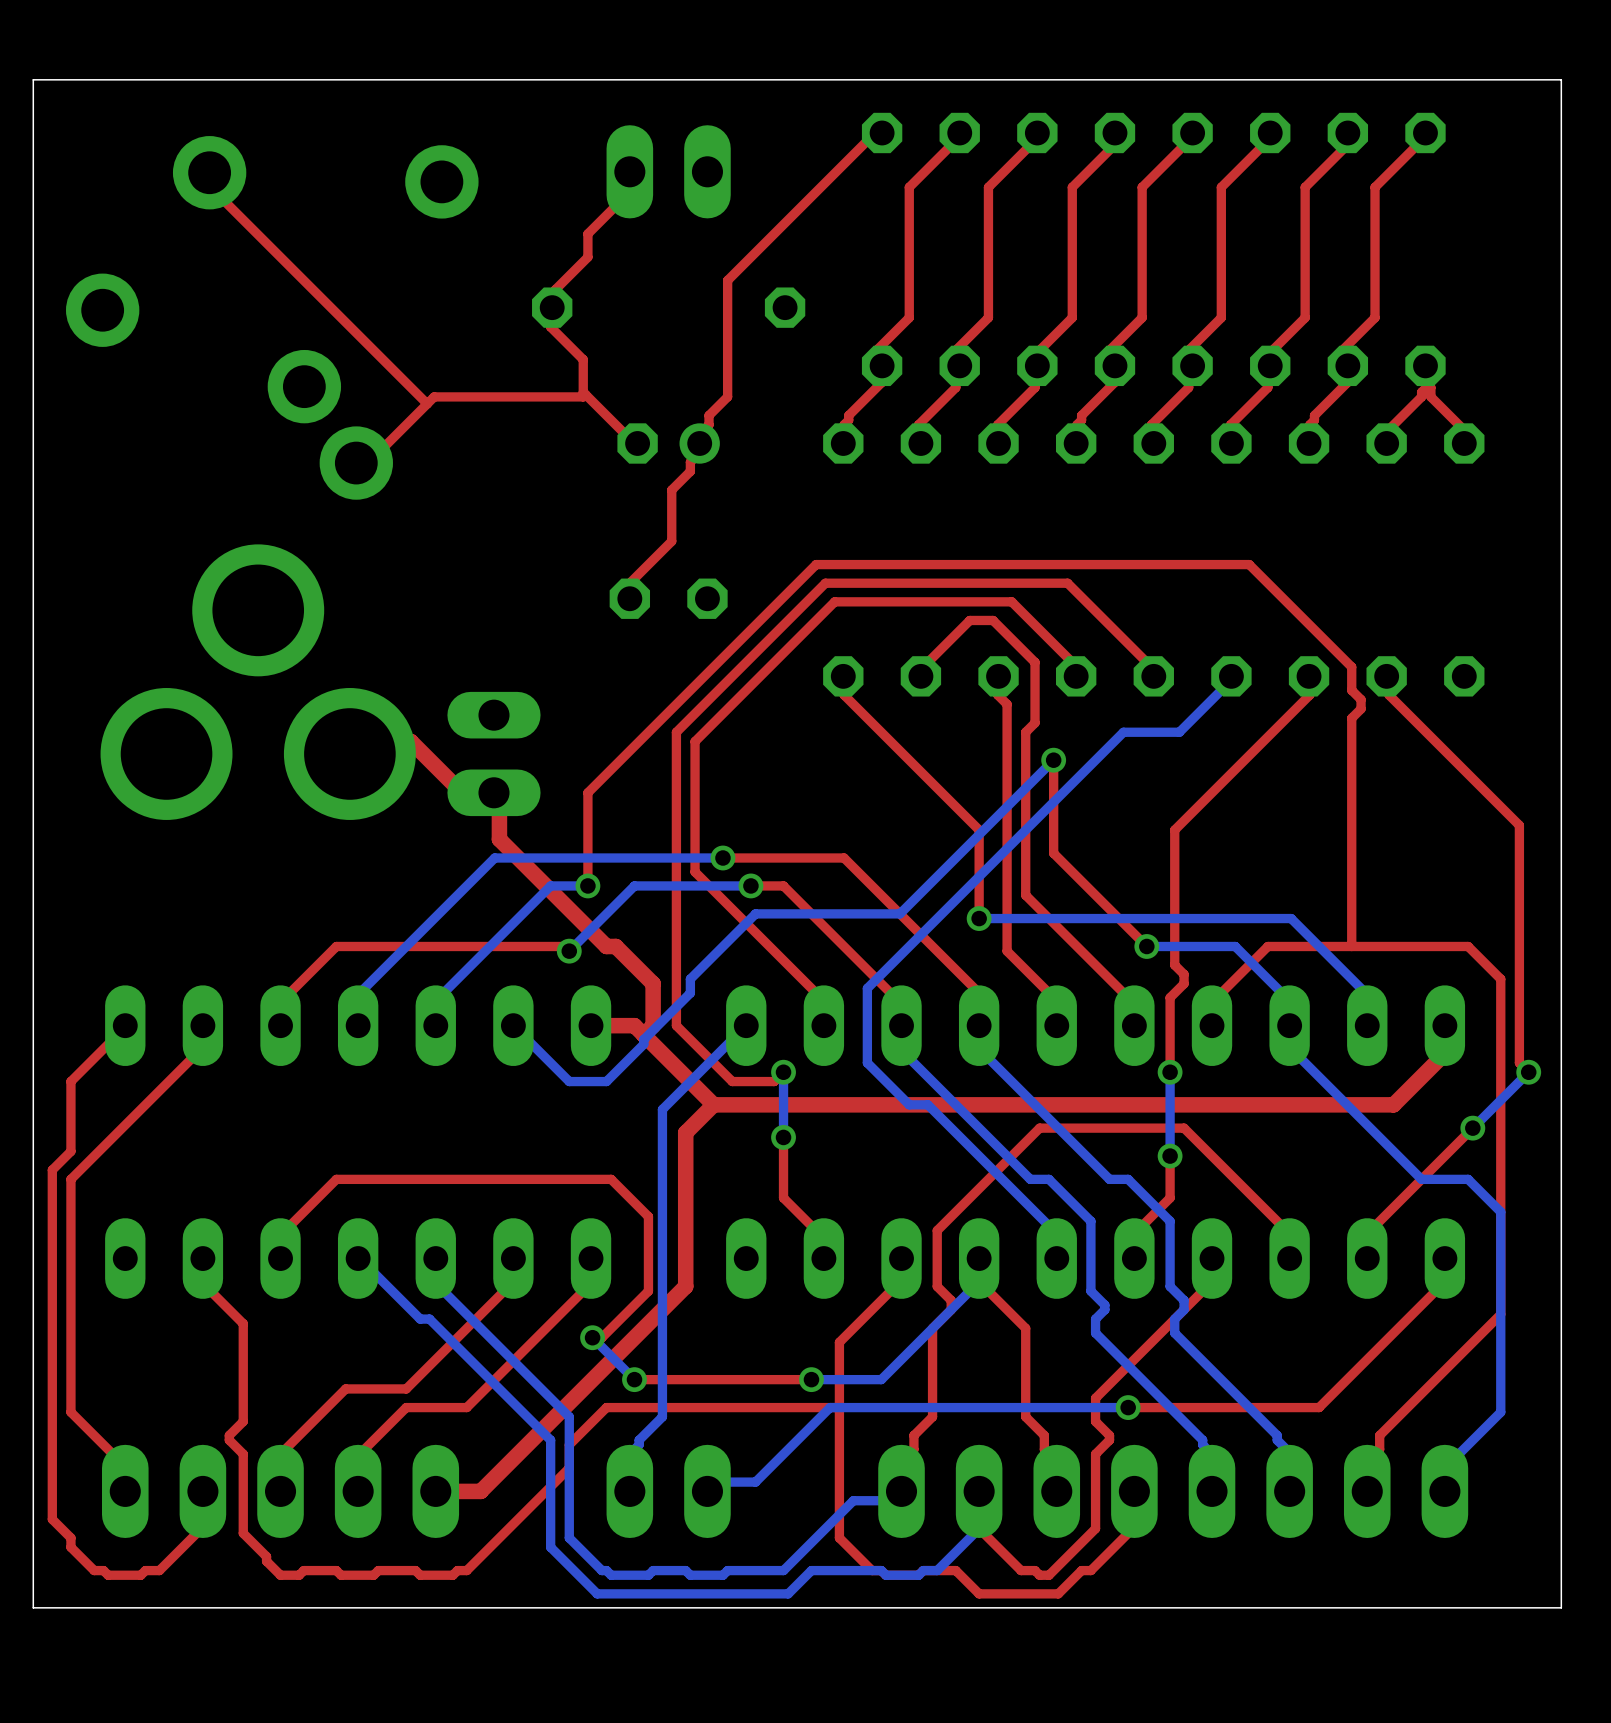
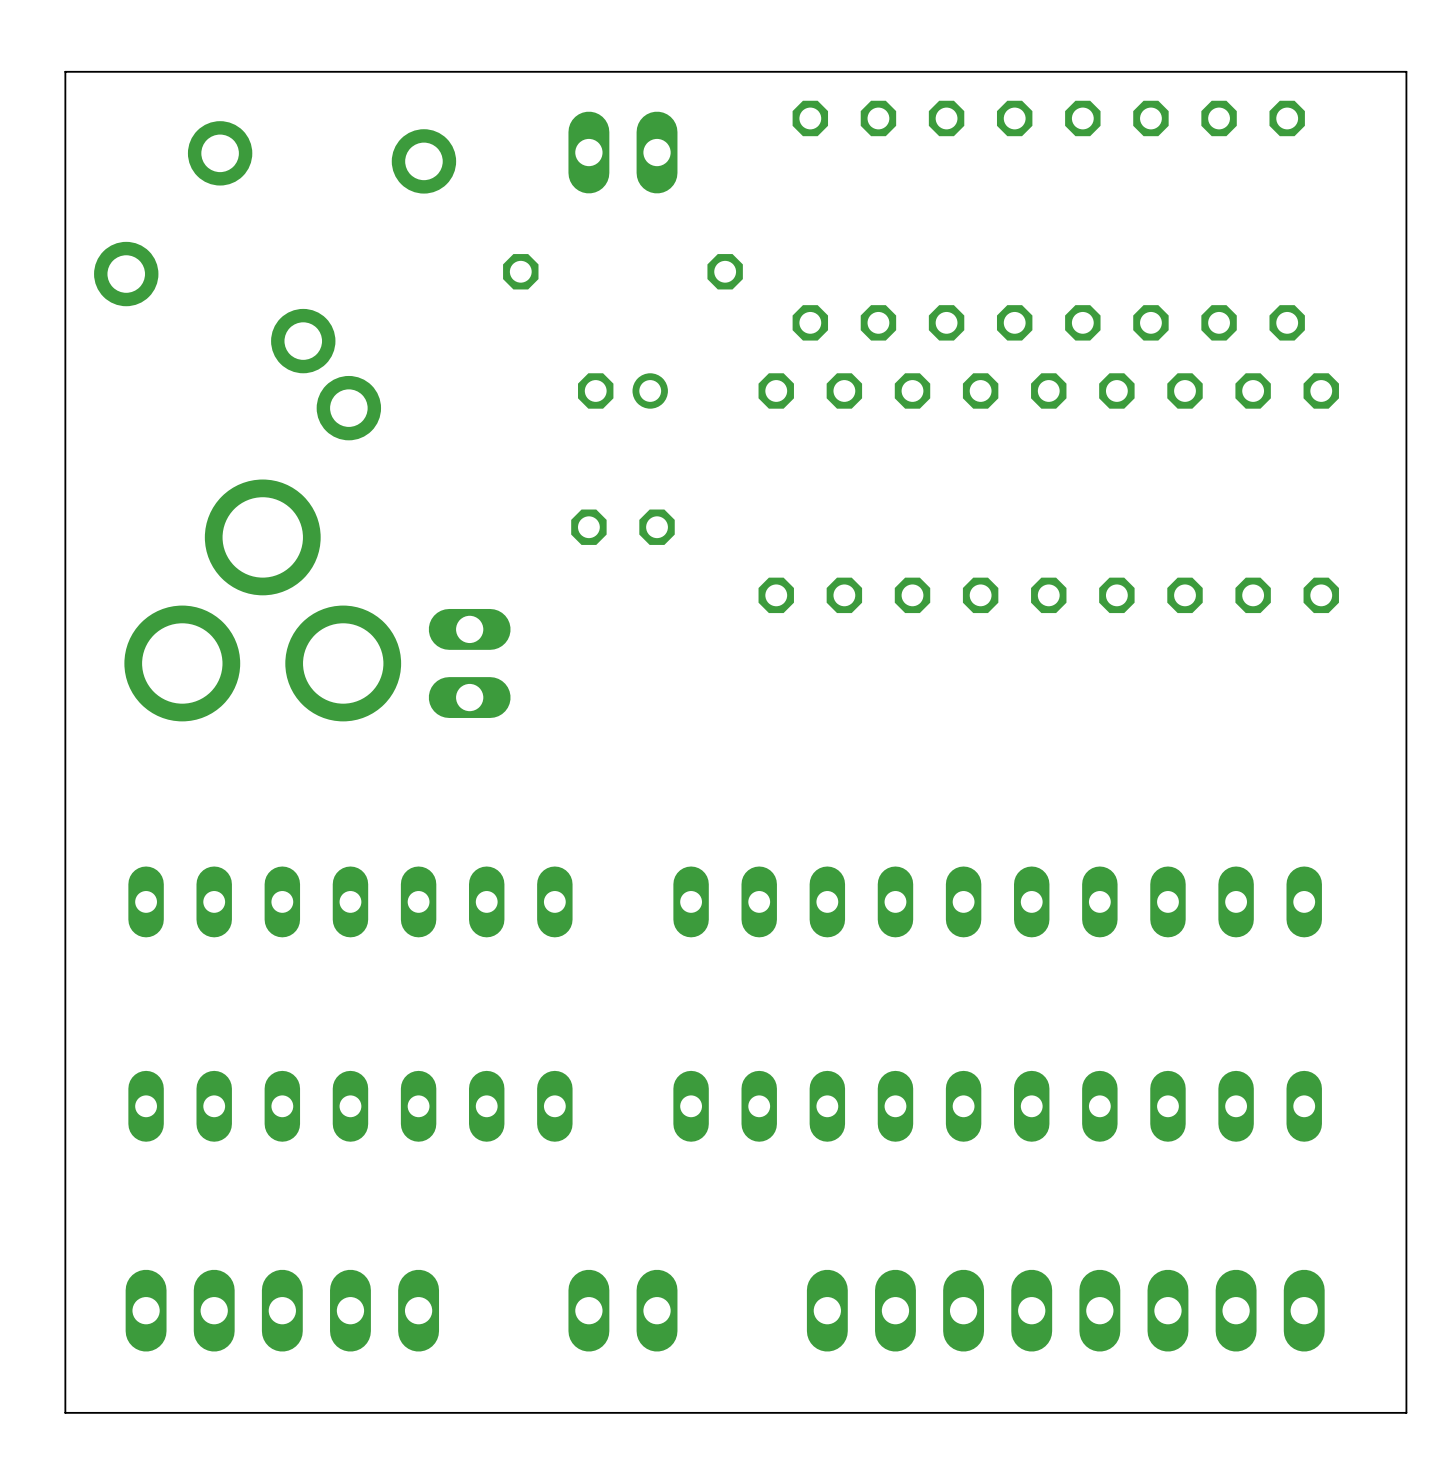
top track: (882, 132) (881, 136) (872, 136) (727, 280) (727, 396) (709, 415) (709, 424) (699, 434) (699, 452) (690, 462) (690, 471) (671, 490) (671, 541) (629, 583) (629, 598) -> none
top track: (959, 132) (955, 136) (955, 140) (909, 187) (909, 317) (876, 350) (876, 368) (882, 365) (881, 382) (848, 415) (848, 420) (844, 424) (843, 443) -> none
top track: (1037, 132) (1035, 140) (988, 187) (988, 317) (955, 350) (955, 364) (959, 365) (955, 368) (955, 387) (918, 424) (918, 443) (920, 443) -> none
top track: (1114, 132) (1114, 145) (1072, 187) (1072, 317) (1039, 350) (1039, 364) (1035, 368) (1035, 387) (997, 424) (998, 443) -> none
top track: (1192, 132) (1188, 136) (1188, 140) (1142, 187) (1142, 317) (1109, 350) (1109, 368) (1114, 365) (1114, 382) (1081, 415) (1081, 420) (1076, 424) (1076, 443) -> none
top track: (1270, 132) (1267, 140) (1221, 187) (1221, 317) (1188, 350) (1188, 364) (1192, 365) (1188, 368) (1188, 387) (1151, 424) (1151, 443) (1153, 443) -> none
top track: (1347, 132) (1347, 145) (1305, 187) (1305, 317) (1272, 350) (1272, 364) (1267, 368) (1267, 387) (1230, 424) (1231, 443) -> none
top track: (1425, 132) (1421, 136) (1421, 140) (1375, 187) (1375, 317) (1342, 350) (1342, 368) (1347, 365) (1347, 382) (1314, 415) (1314, 420) (1309, 424) (1309, 443) -> none
top track: (629, 171) (629, 191) (587, 233) (587, 257) (555, 289) (555, 303) (550, 308) (550, 327) (583, 359) (583, 392) (634, 443) (637, 443) -> none
top track: (209, 172) (210, 187) (427, 403) -> none
top track: (1425, 365) (1426, 382) (1430, 387) (1430, 396) (1463, 429) (1464, 443) -> none
top track: (1428, 385) (1421, 392) (1421, 396) (1388, 429) (1388, 443) (1386, 443) -> none
top track: (585, 394) (583, 396) (434, 396) (369, 462) (356, 463) -> none
top track: (843, 676) (844, 694) (979, 830) (979, 918) -> none
top track: (920, 676) (923, 676) (923, 667) (969, 620) (993, 620) (1035, 662) (1035, 722) (1025, 732) (1025, 895) (1132, 1002) (1132, 1025) (1134, 1025) -> none
top track: (998, 676) (997, 694) (1007, 704) (1007, 951) (1053, 997) (1053, 1025) (1056, 1025) -> none
top track: (1076, 676) (1072, 676) (1072, 662) (1011, 601) (834, 601) (695, 741) (695, 871) (820, 997) (820, 1025) (823, 1025) -> none
top track: (1153, 676) (1151, 676) (1151, 667) (1067, 583) (825, 583) (676, 732) (676, 1025) (732, 1081) (774, 1081) (783, 1072) -> none
bottom track: (1231, 676) (1235, 676) (1179, 732) (1123, 732) (867, 988) (867, 1062) (909, 1104) (927, 1104) (1053, 1230) (1053, 1258) (1056, 1258) -> none
top track: (1309, 676) (1309, 694) (1174, 830) (1174, 965) (1184, 974) (1184, 983) (1170, 997) (1170, 1072) -> none
top track: (1386, 676) (1388, 676) (1388, 694) (1519, 825) (1519, 1062) (1528, 1072) -> none
top track: (349, 753) (350, 750) (359, 741) (410, 741) (462, 792) (493, 792) (499, 797) (499, 839) (606, 946) (615, 946) (653, 983) (653, 1025) (643, 1034) -> none
top track: (1053, 760) (1053, 853) (1146, 946) -> none
bottom track: (1053, 760) (899, 913) (755, 913) (690, 979) (690, 993) (643, 1039) (643, 1044) (606, 1081) (569, 1081) (513, 1025) -> none
via: (1053, 760) -> none
top track: (722, 858) (844, 858) (979, 993) (979, 1025) -> none
bottom track: (722, 858) (494, 858) (359, 993) (359, 1025) (358, 1025) -> none
via: (722, 858) -> none
top track: (587, 885) (587, 792) (816, 564) (1249, 564) (1351, 667) (1351, 690) (1361, 699) (1361, 708) (1351, 718) (1351, 946) -> none
bottom track: (587, 885) (550, 885) (438, 997) (438, 1025) (435, 1025) -> none
via: (587, 885) -> none
top track: (750, 885) (783, 885) (899, 1002) (899, 1025) (901, 1025) -> none
bottom track: (750, 885) (634, 885) (569, 951) -> none
via: (750, 885) -> none
bottom track: (979, 918) (1291, 918) (1365, 993) (1365, 1025) (1367, 1025) -> none
via: (979, 918) -> none
bottom track: (1146, 946) (1235, 946) (1286, 997) (1286, 1025) (1291, 1025) (1291, 1048) (1421, 1179) (1468, 1179) (1500, 1211) (1500, 1412) (1444, 1468) (1444, 1491) -> none
via: (1146, 946) -> none
top track: (569, 951) (564, 946) (336, 946) (280, 1002) (280, 1025) -> none
via: (569, 951) -> none
top track: (125, 1025) (122, 1025) (112, 1034) (112, 1039) (70, 1081) (70, 1151) (52, 1170) (52, 1519) (70, 1537) (70, 1547) (94, 1570) (103, 1570) (108, 1575) (140, 1575) (145, 1570) (159, 1570) (201, 1528) (201, 1491) (202, 1491) -> none
top track: (202, 1025) (201, 1025) (201, 1048) (70, 1179) (70, 1412) (122, 1463) (122, 1491) (125, 1491) -> none
top track: (591, 1025) (634, 1025) (713, 1104) -> none
bottom track: (746, 1025) (662, 1109) (662, 1416) (639, 1440) (639, 1444) (629, 1454) (629, 1491) -> none
bottom track: (901, 1025) (904, 1025) (904, 1053) (1030, 1179) (1049, 1179) (1090, 1221) (1090, 1291) (1104, 1305) (1104, 1309) (1095, 1319) (1095, 1333) (1202, 1440) (1202, 1444) (1212, 1454) (1212, 1491) -> none
bottom track: (979, 1025) (979, 1048) (1109, 1179) (1128, 1179) (1170, 1221) (1170, 1286) (1184, 1300) (1184, 1309) (1174, 1319) (1174, 1333) (1277, 1435) (1277, 1440) (1291, 1454) (1291, 1491) (1289, 1491) -> none
top track: (1212, 1025) (1212, 1002) (1267, 946) (1468, 946) (1500, 979) (1500, 1314) (1379, 1435) (1379, 1449) (1370, 1458) (1370, 1491) (1367, 1491) -> none
top track: (1444, 1025) (1444, 1053) (1393, 1104) (713, 1104) -> none
bottom track: (783, 1072) (783, 1137) -> none
via: (783, 1072) -> none
bottom track: (1170, 1072) (1170, 1156) -> none
via: (1170, 1072) -> none
bottom track: (1528, 1072) (1472, 1128) -> none
via: (1528, 1072) -> none
top track: (713, 1104) (685, 1132) (685, 1286) (480, 1491) (435, 1491) -> none
top track: (1472, 1128) (1370, 1230) (1370, 1258) (1367, 1258) -> none
via: (1472, 1128) -> none
top track: (783, 1137) (783, 1197) (820, 1235) (820, 1258) (823, 1258) -> none
via: (783, 1137) -> none
top track: (1170, 1156) (1170, 1197) (1137, 1230) (1137, 1258) (1134, 1258) -> none
via: (1170, 1156) -> none
top track: (202, 1258) (206, 1258) (206, 1286) (243, 1323) (243, 1421) (229, 1435) (229, 1440) (243, 1454) (243, 1533) (266, 1556) (266, 1561) (280, 1575) (299, 1575) (303, 1570) (336, 1570) (341, 1575) (373, 1575) (378, 1570) (415, 1570) (420, 1575) (452, 1575) (457, 1570) (466, 1570) (569, 1468) (569, 1444) (606, 1407) (839, 1407) -> none
top track: (280, 1258) (280, 1235) (336, 1179) (611, 1179) (648, 1216) (648, 1291) (601, 1337) (592, 1337) -> none
bottom track: (358, 1258) (420, 1319) (429, 1319) (550, 1440) (550, 1547) (597, 1593) (788, 1593) (811, 1570) (881, 1570) (885, 1575) (918, 1575) (923, 1570) (937, 1570) (979, 1528) (979, 1491) -> none
bottom track: (435, 1258) (438, 1258) (438, 1286) (569, 1416) (569, 1537) (601, 1570) (606, 1570) (611, 1575) (648, 1575) (653, 1570) (685, 1570) (690, 1575) (722, 1575) (727, 1570) (783, 1570) (853, 1500) (890, 1500) (901, 1491) -> none
top track: (513, 1258) (513, 1281) (406, 1388) (345, 1388) (280, 1454) (280, 1491) -> none
top track: (591, 1258) (587, 1258) (587, 1286) (466, 1407) (406, 1407) (359, 1454) (359, 1491) (358, 1491) -> none
top track: (901, 1258) (899, 1258) (899, 1281) (839, 1342) (839, 1537) (872, 1570) (881, 1570) (885, 1575) (918, 1575) (923, 1570) (955, 1570) (979, 1593) (1058, 1593) (1081, 1570) (1090, 1570) (1132, 1528) (1132, 1491) (1134, 1491) -> none
top track: (979, 1258) (979, 1281) (1025, 1328) (1025, 1416) (1044, 1435) (1044, 1449) (1053, 1458) (1053, 1491) (1056, 1491) -> none
bottom track: (979, 1258) (979, 1281) (881, 1379) (811, 1379) -> none
top track: (1212, 1258) (1212, 1281) (1095, 1398) (1095, 1421) (1109, 1435) (1109, 1440) (1095, 1454) (1095, 1528) (1049, 1575) (1039, 1575) (1035, 1570) (1021, 1570) (979, 1528) (979, 1491) -> none
top track: (1289, 1258) (1286, 1258) (1286, 1230) (1184, 1128) (1039, 1128) (937, 1230) (937, 1286) (951, 1300) (951, 1309) (932, 1328) (932, 1416) (913, 1435) (913, 1449) (904, 1458) (904, 1491) (901, 1491) -> none
top track: (1444, 1258) (1444, 1281) (1319, 1407) (1128, 1407) -> none
bottom track: (592, 1337) (634, 1379) -> none
via: (592, 1337) -> none
via: (634, 1379) -> none
top track: (811, 1379) (634, 1379) -> none
via: (811, 1379) -> none
bottom track: (1128, 1407) (830, 1407) (755, 1482) (718, 1482) (707, 1491) -> none
via: (1128, 1407) -> none

